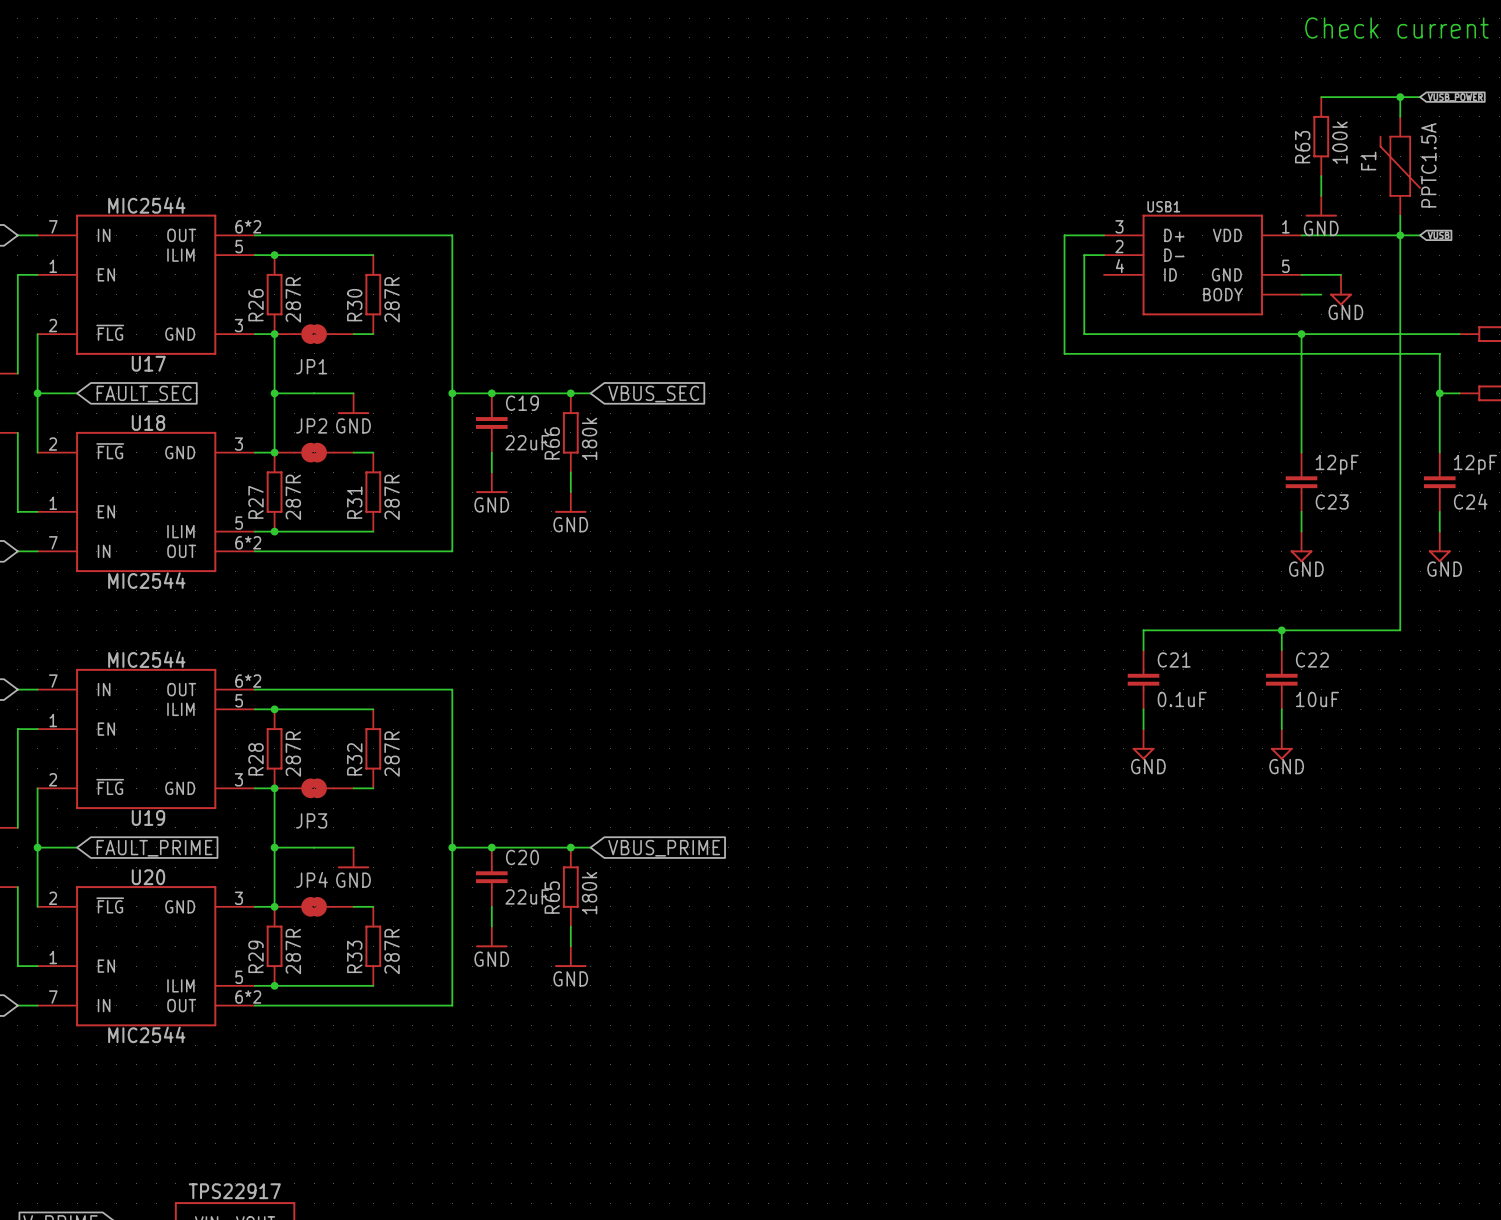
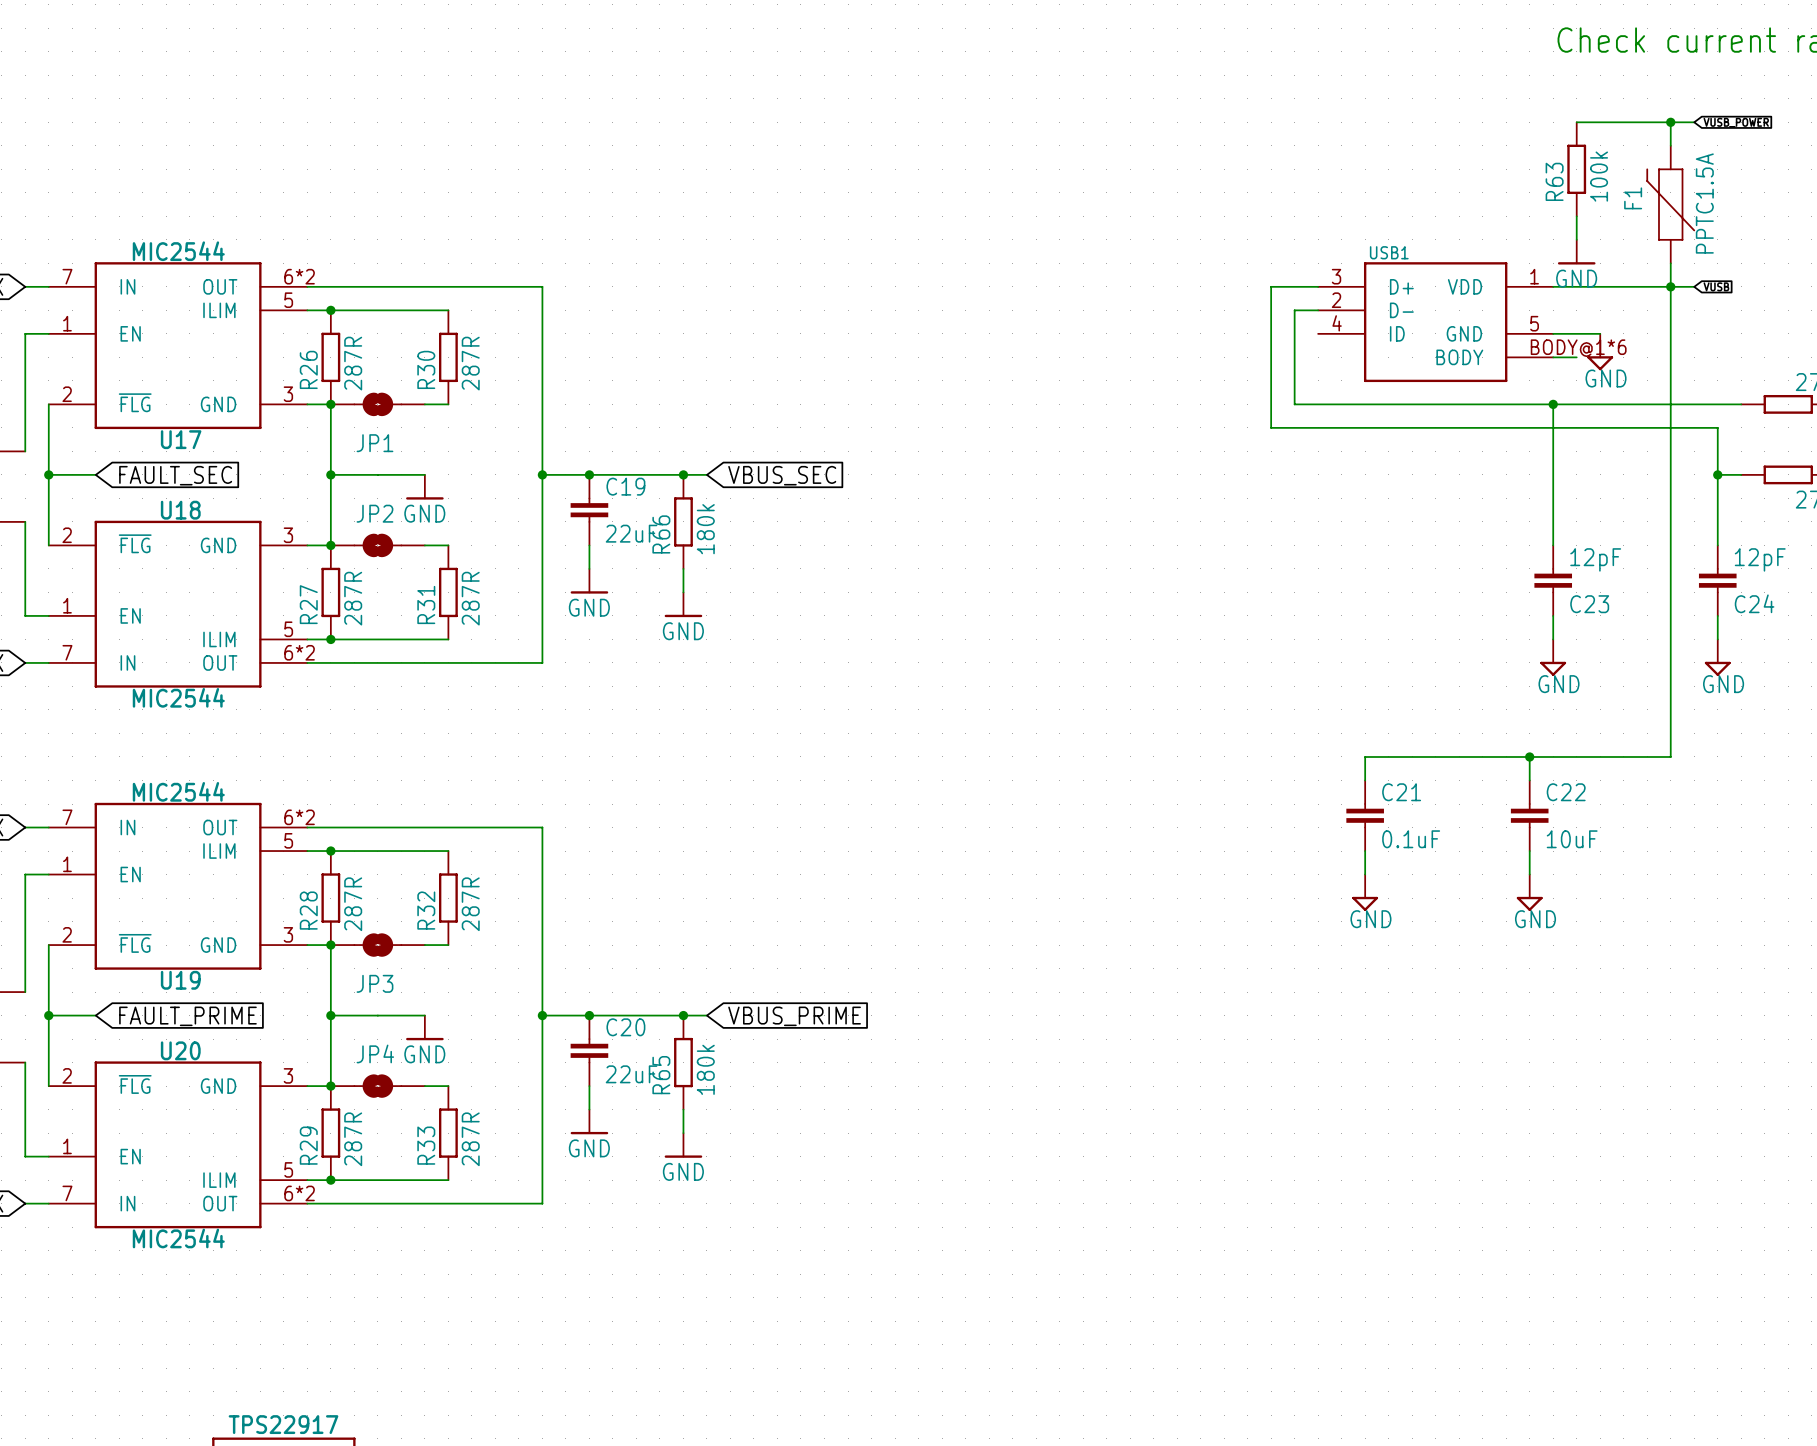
USB1 pin number: none -> BODY@1*6 (1578, 348)

